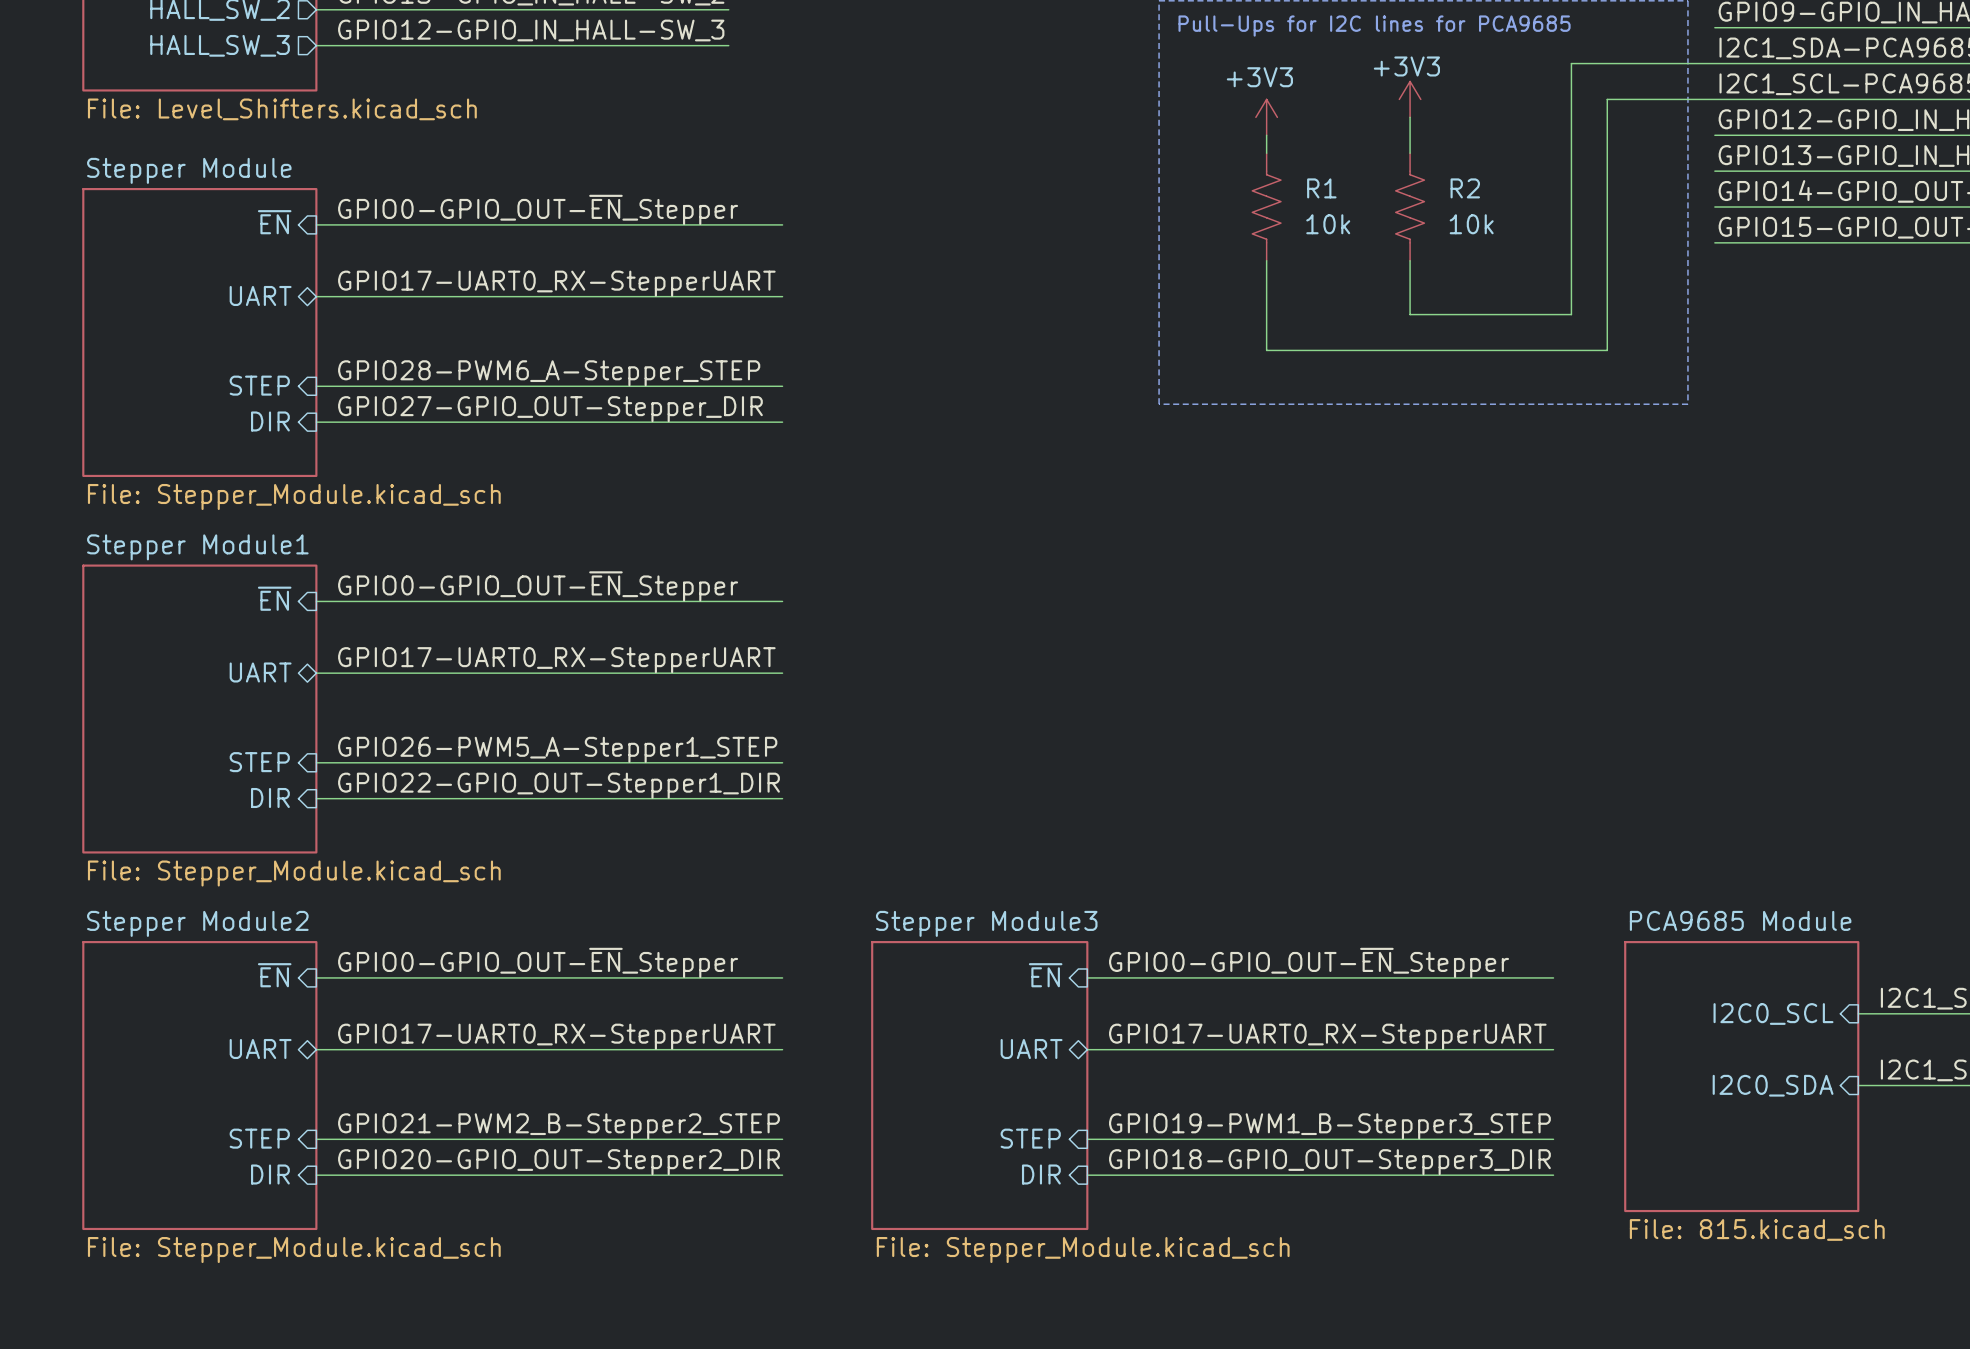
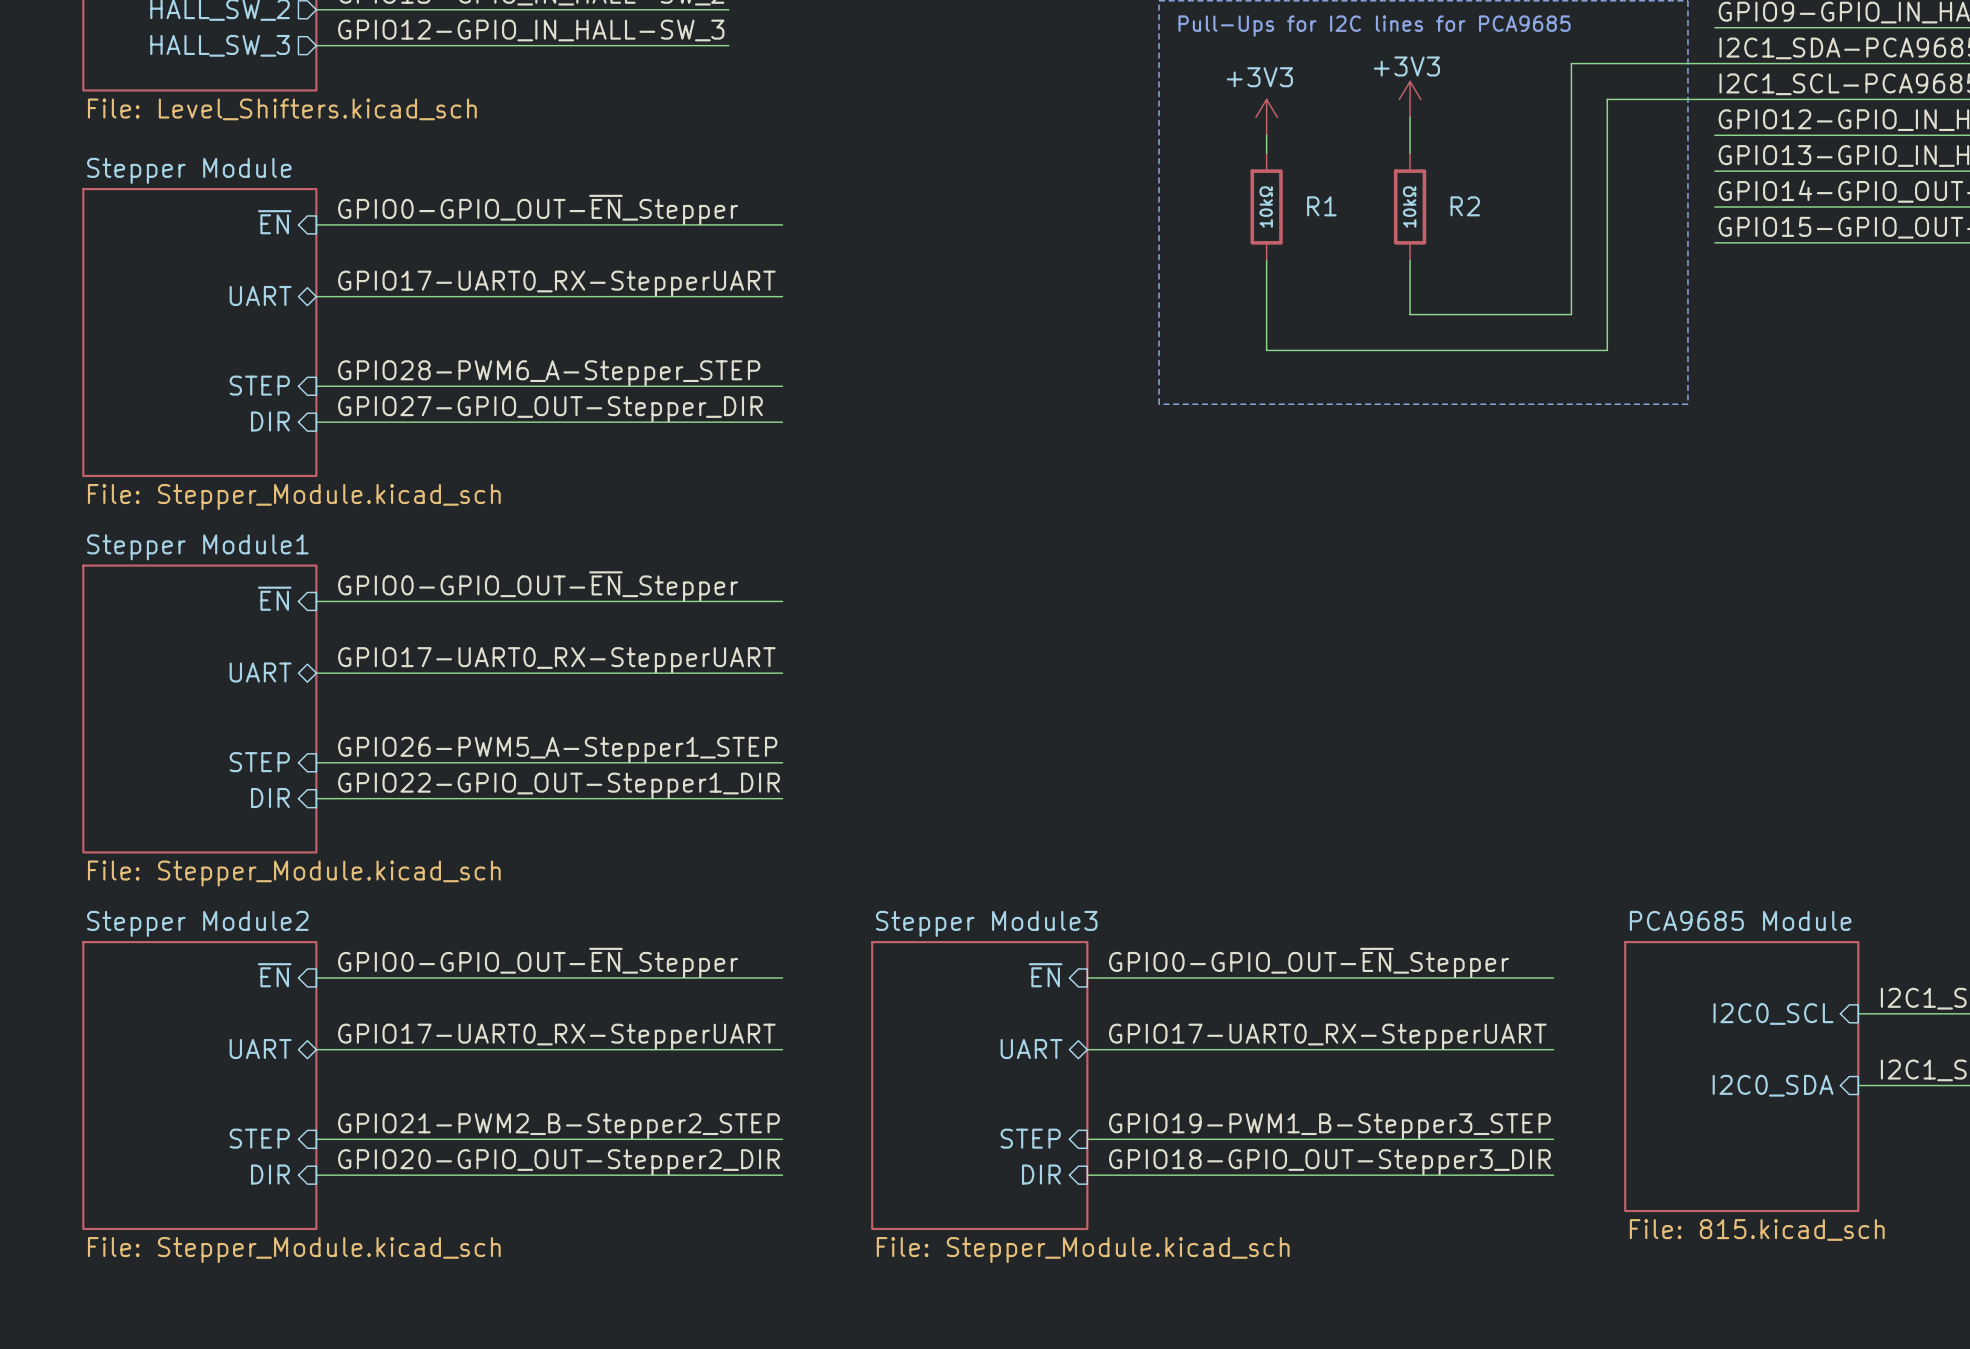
R1 symbol: [1252, 153, 1281, 261] -> [1250, 153, 1283, 261]
R2 symbol: [1395, 153, 1425, 261] -> [1393, 153, 1427, 261]
R1 value: 10k (1328, 224) -> 10kΩ (1266, 207)
R2 value: 10k (1471, 224) -> 10kΩ (1409, 207)

